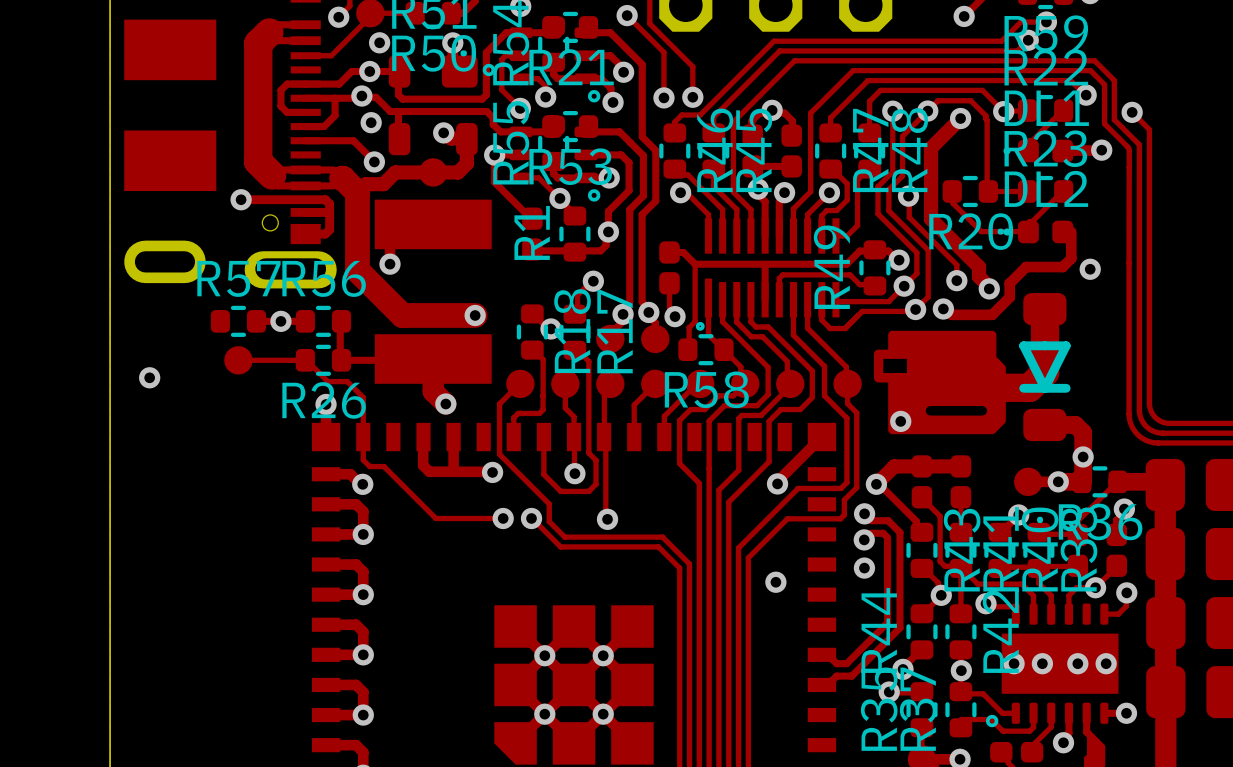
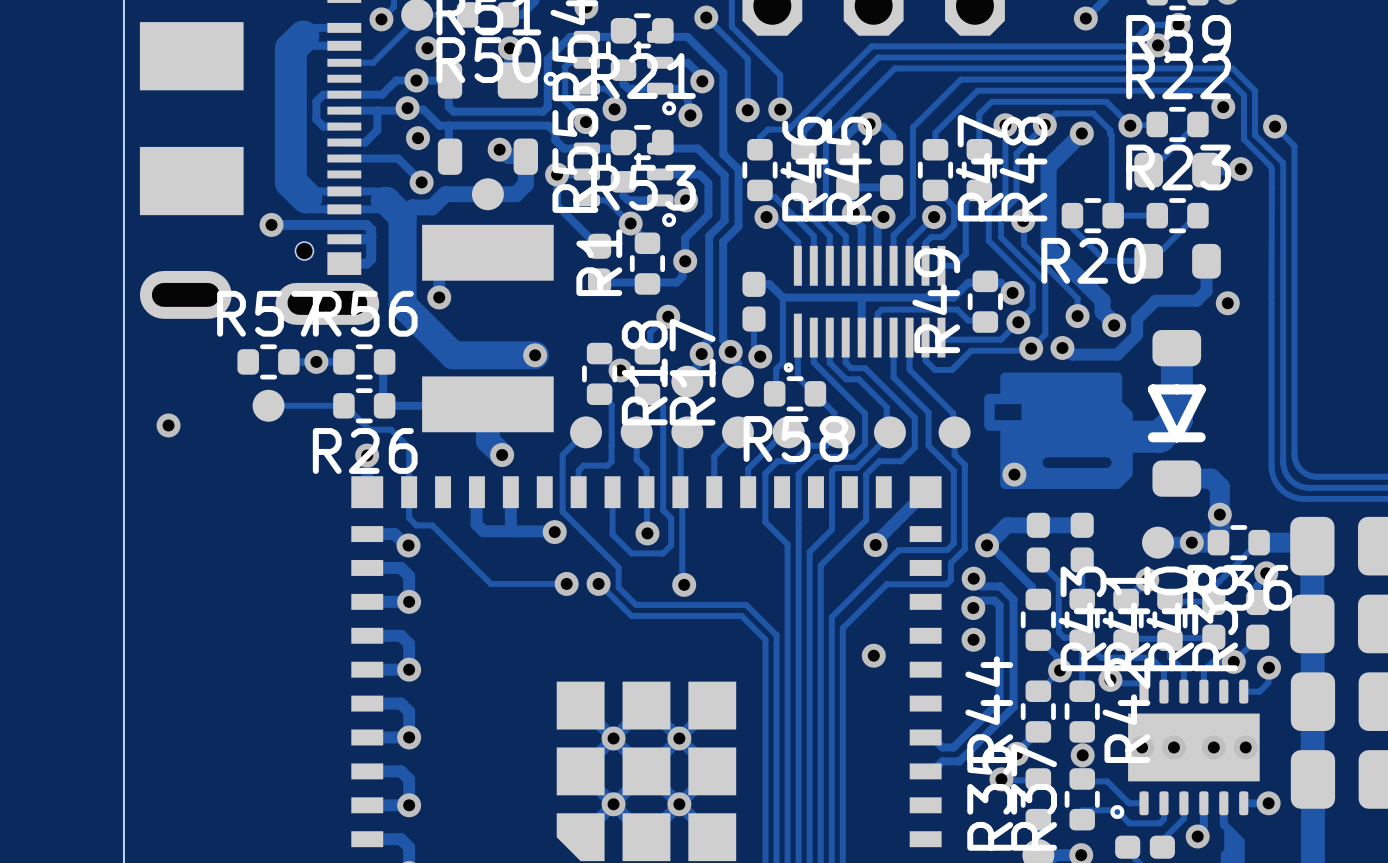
DL1: (1038, 151) -> none
part: none -> (1177, 170)
DL2: (1038, 231) -> none
part: none -> (1177, 261)

